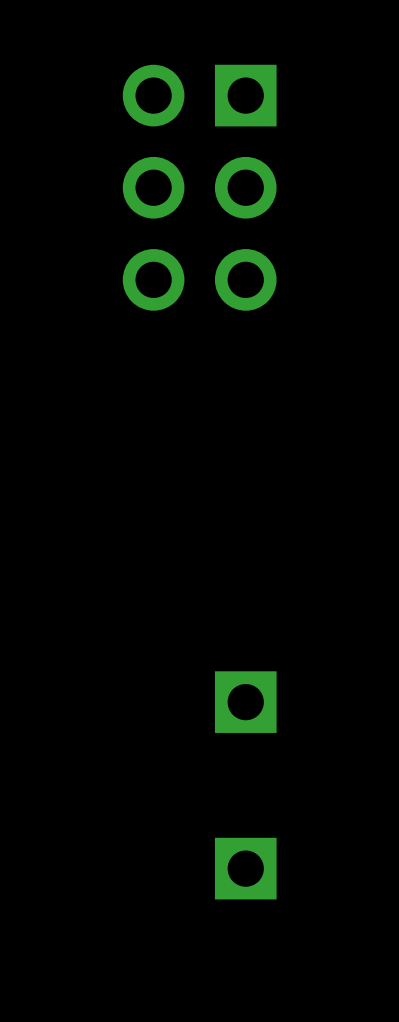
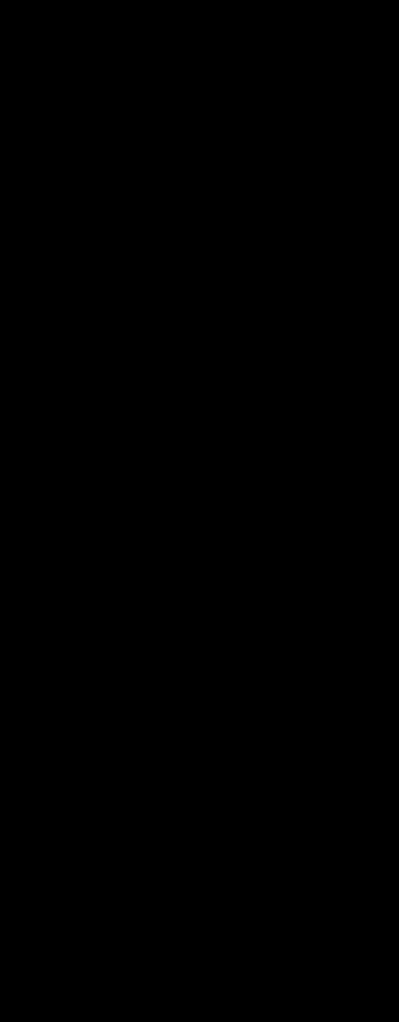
part: (199, 187) -> none
part: (245, 702) -> none
part: (245, 868) -> none

